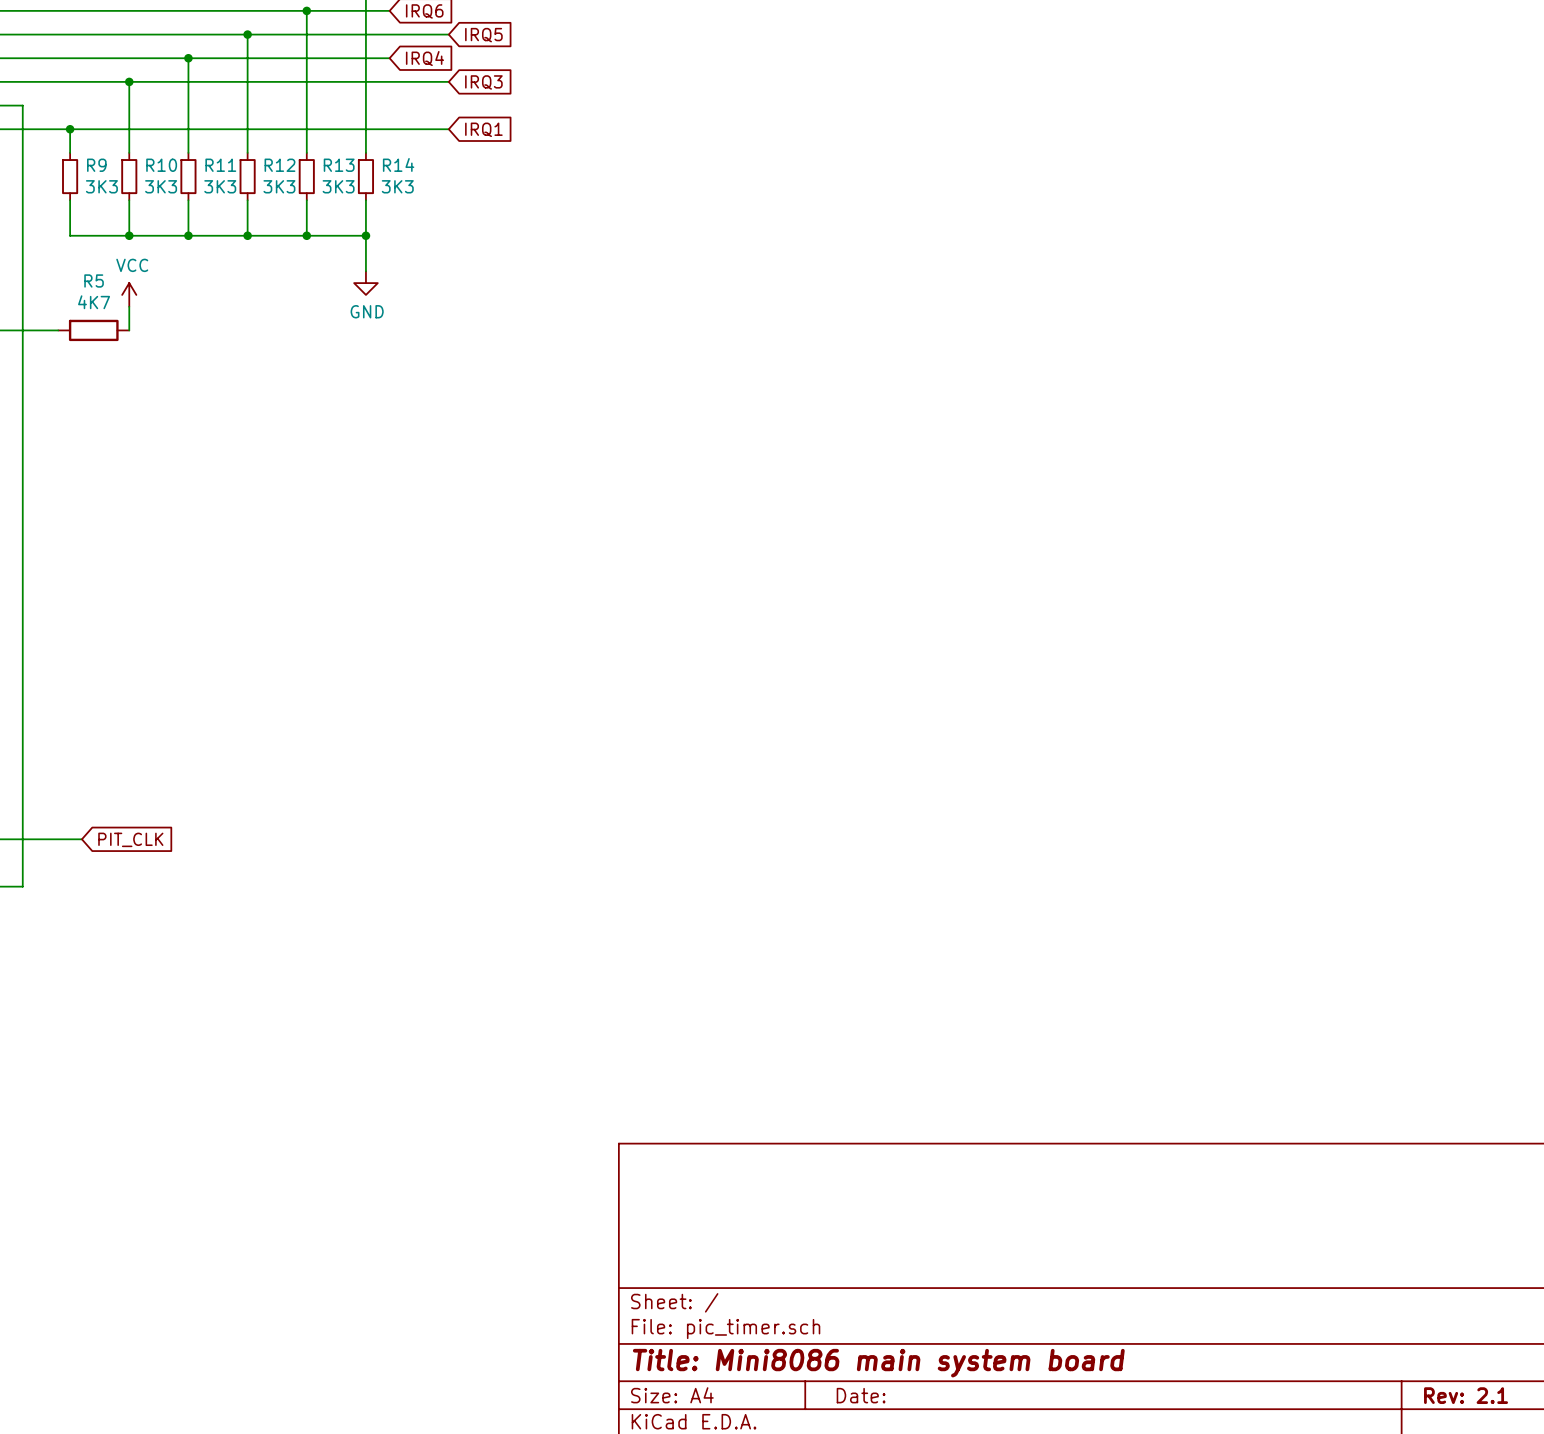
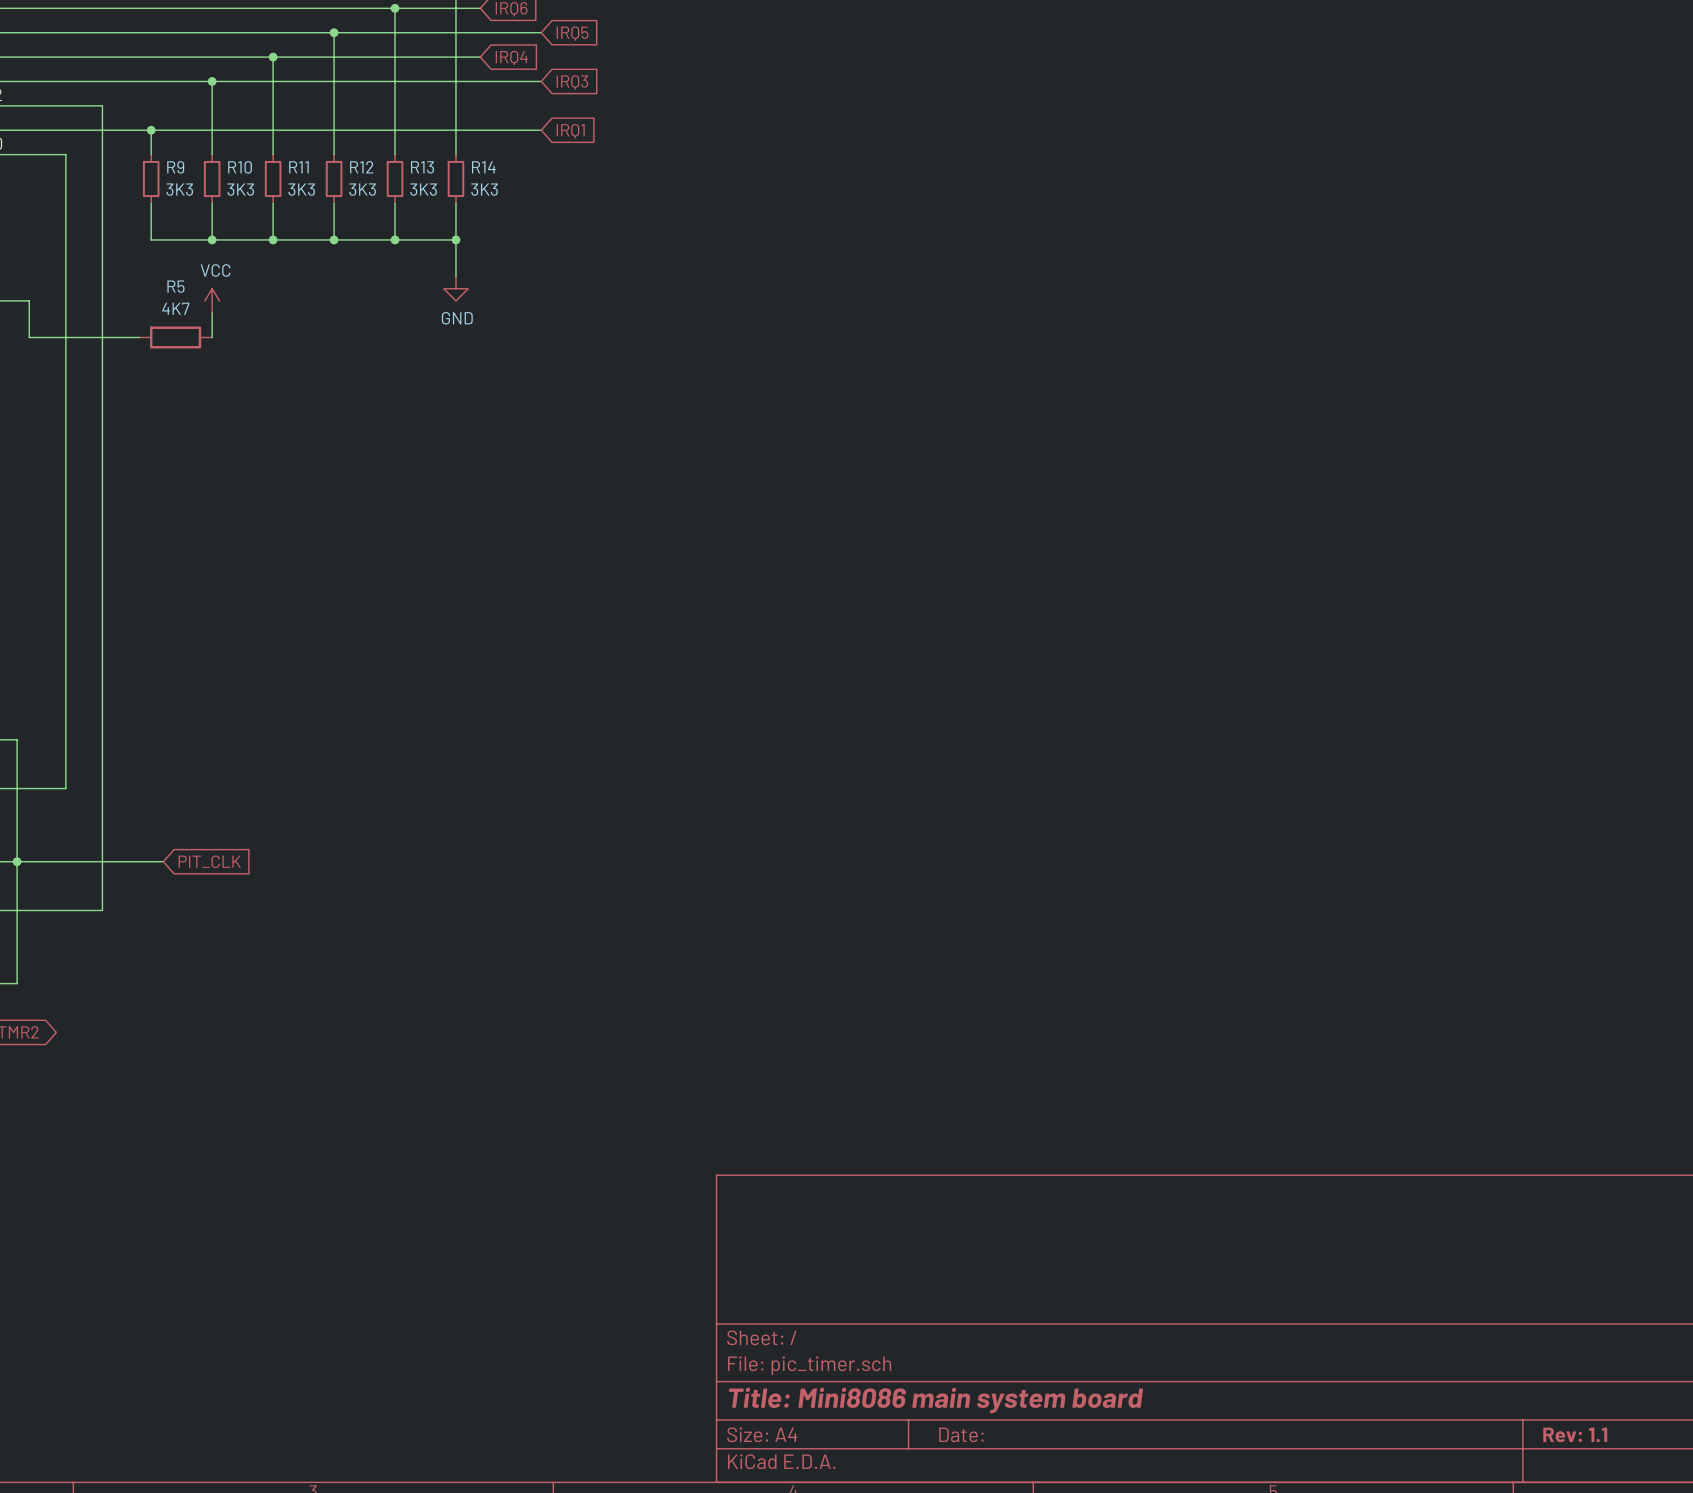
title block: Rev: 2.1 (1466, 1395) -> Rev: 1.1 (1575, 1434)

